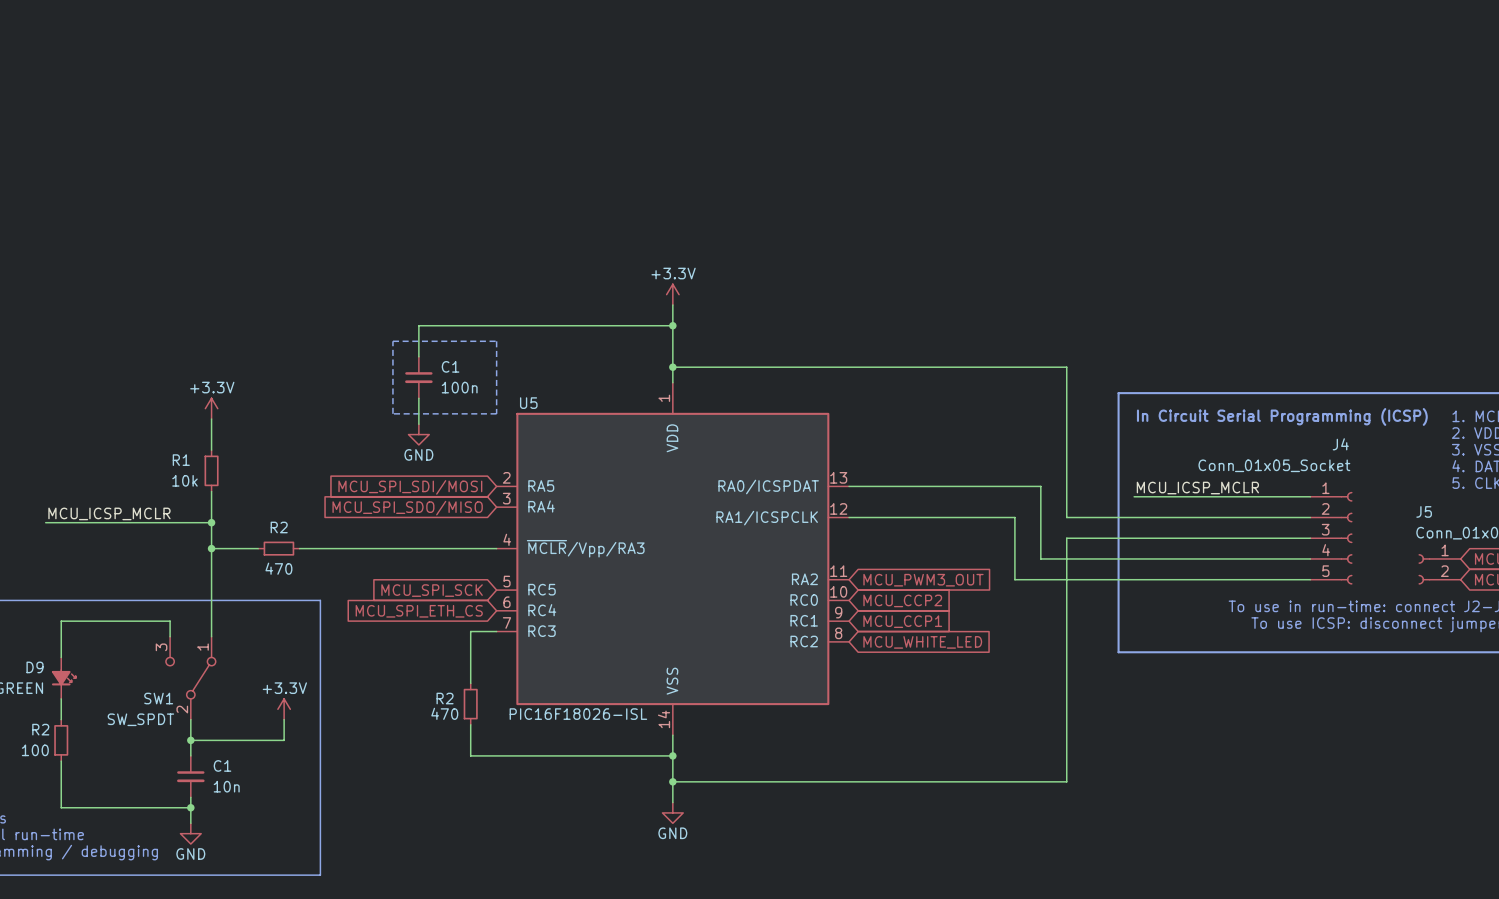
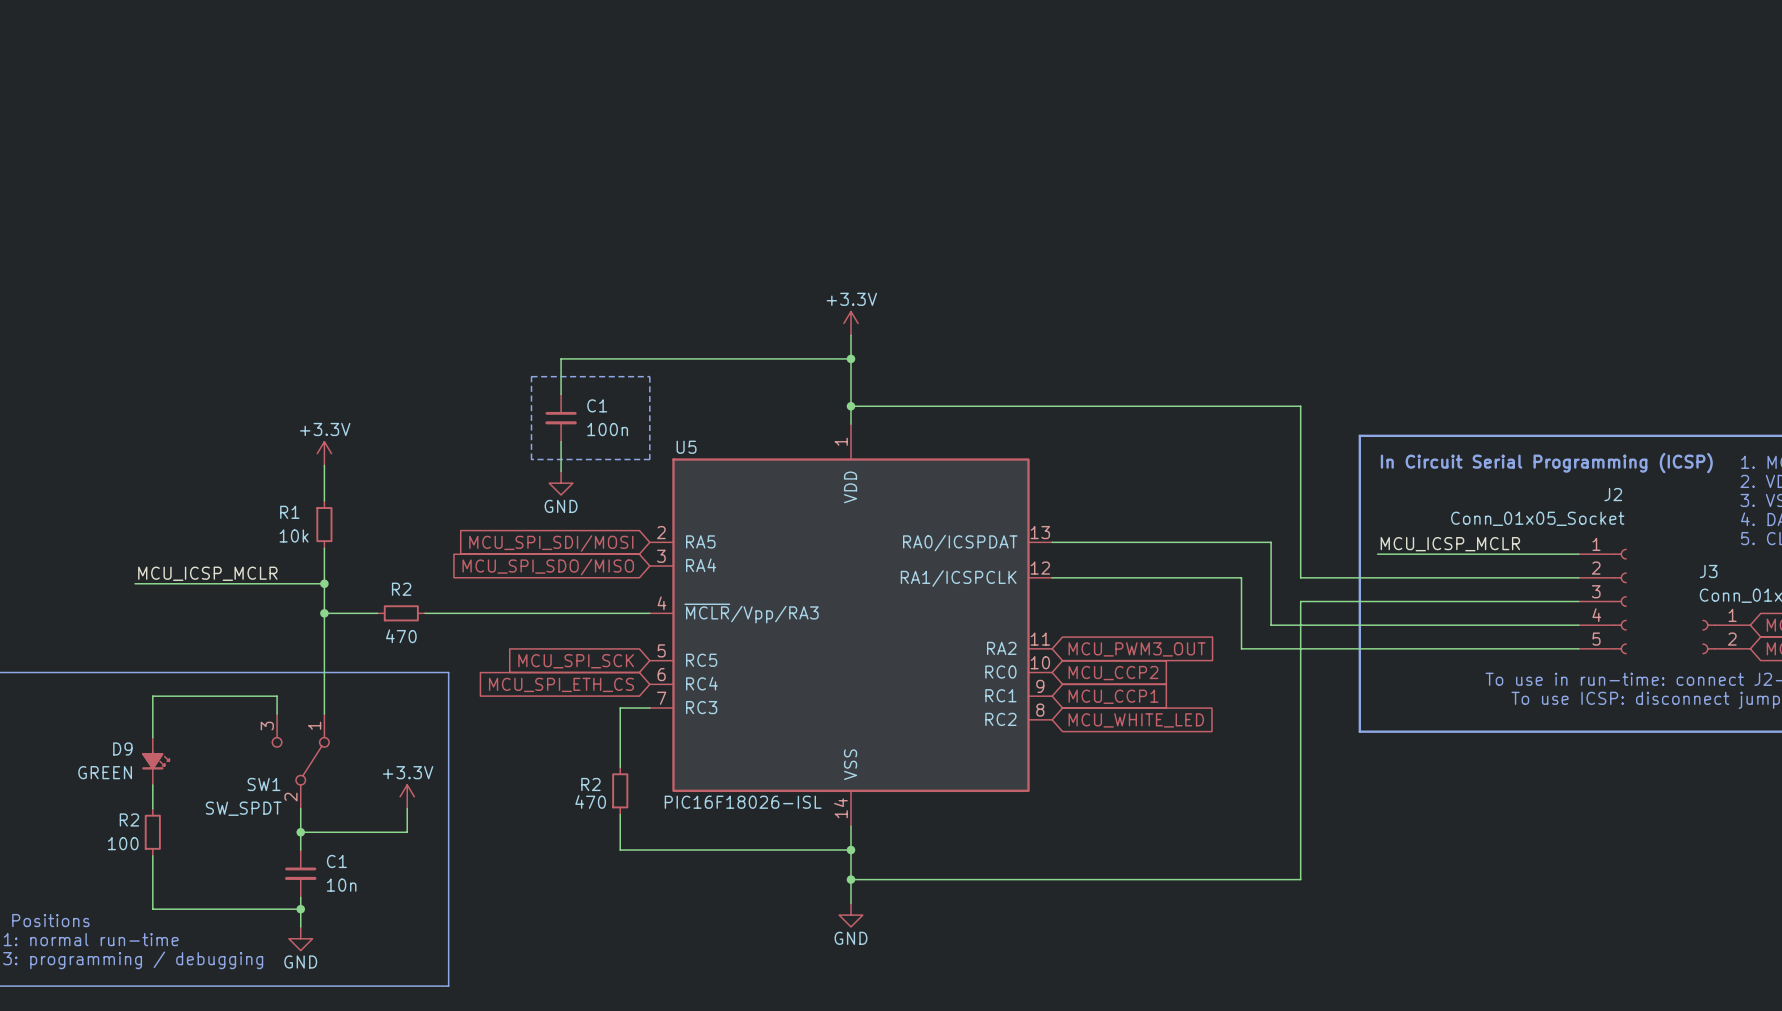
J4 name: J4 (1340, 444) -> J2 (1613, 494)
J5 name: J5 (1424, 511) -> J3 (1708, 571)

